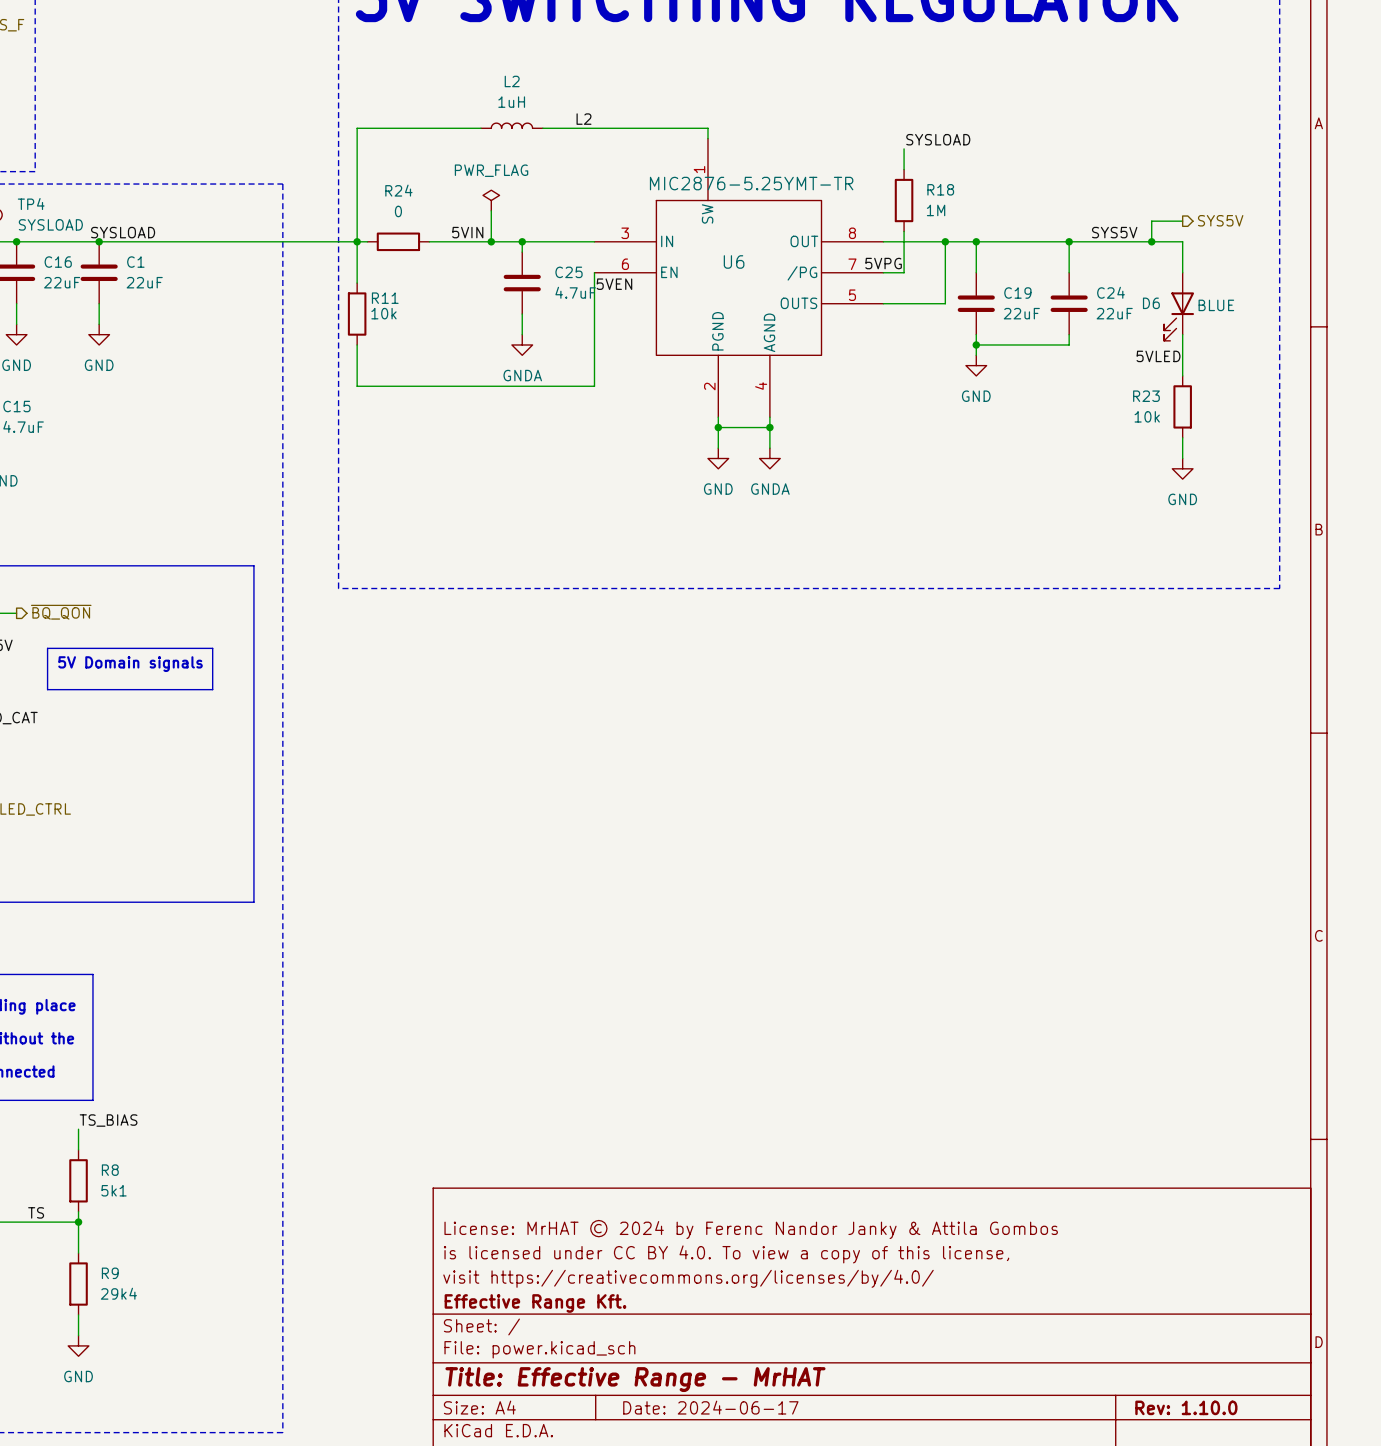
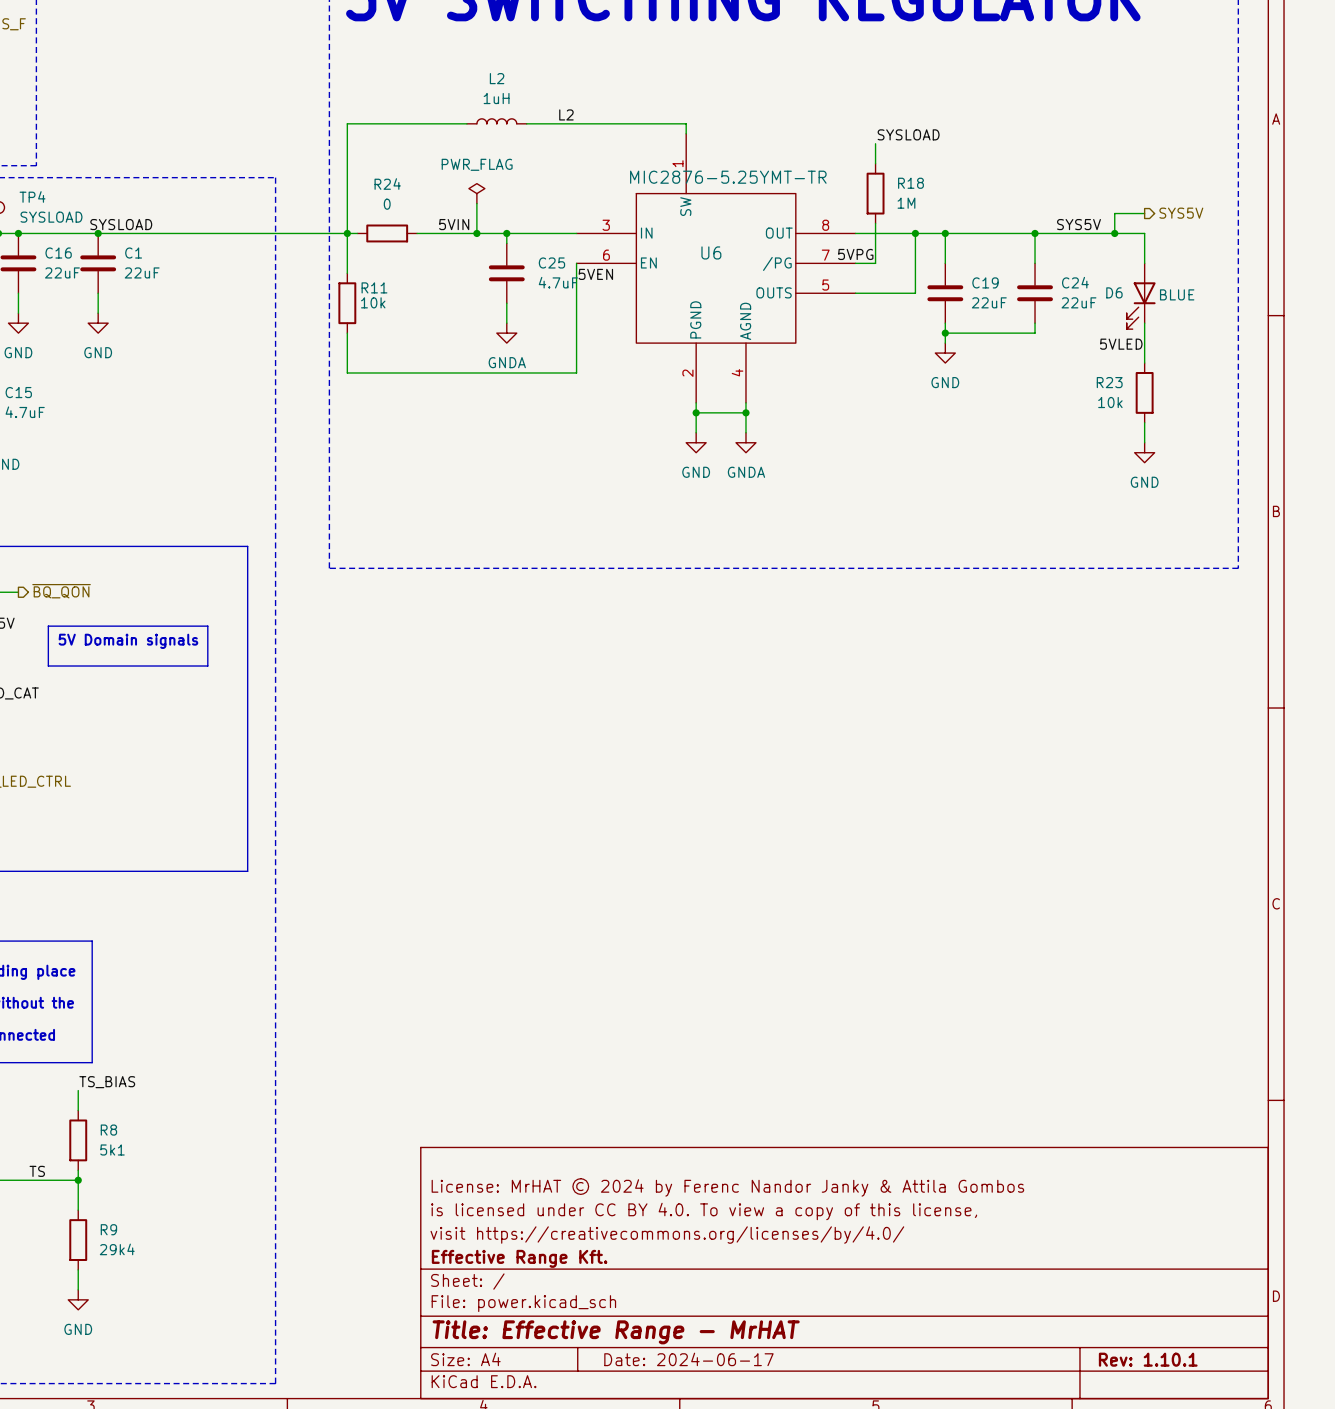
title block: Rev: 1.10.0 (1186, 1407) -> Rev: 1.10.1 (1148, 1359)

